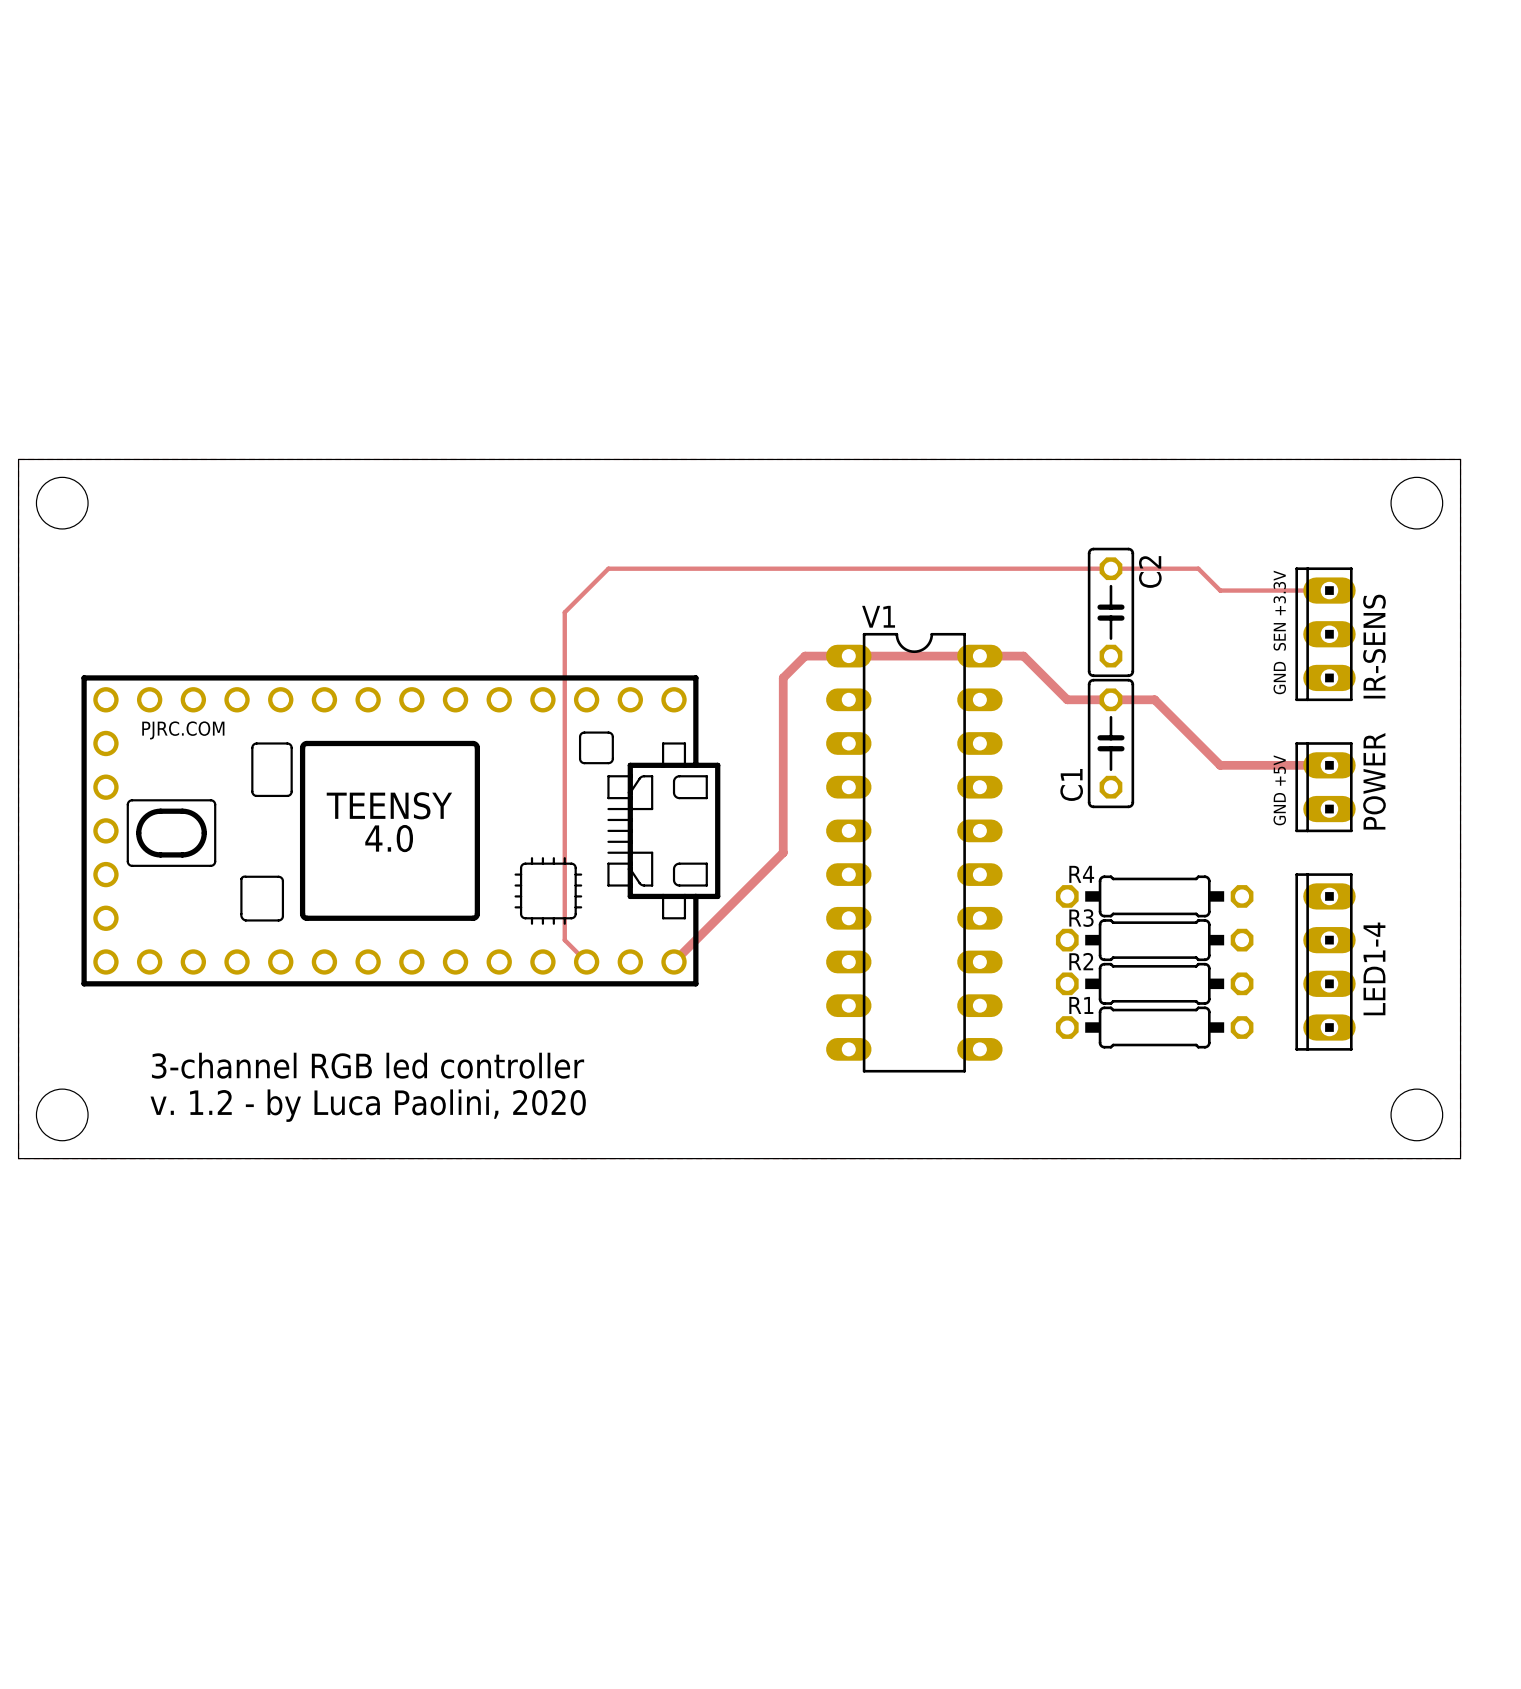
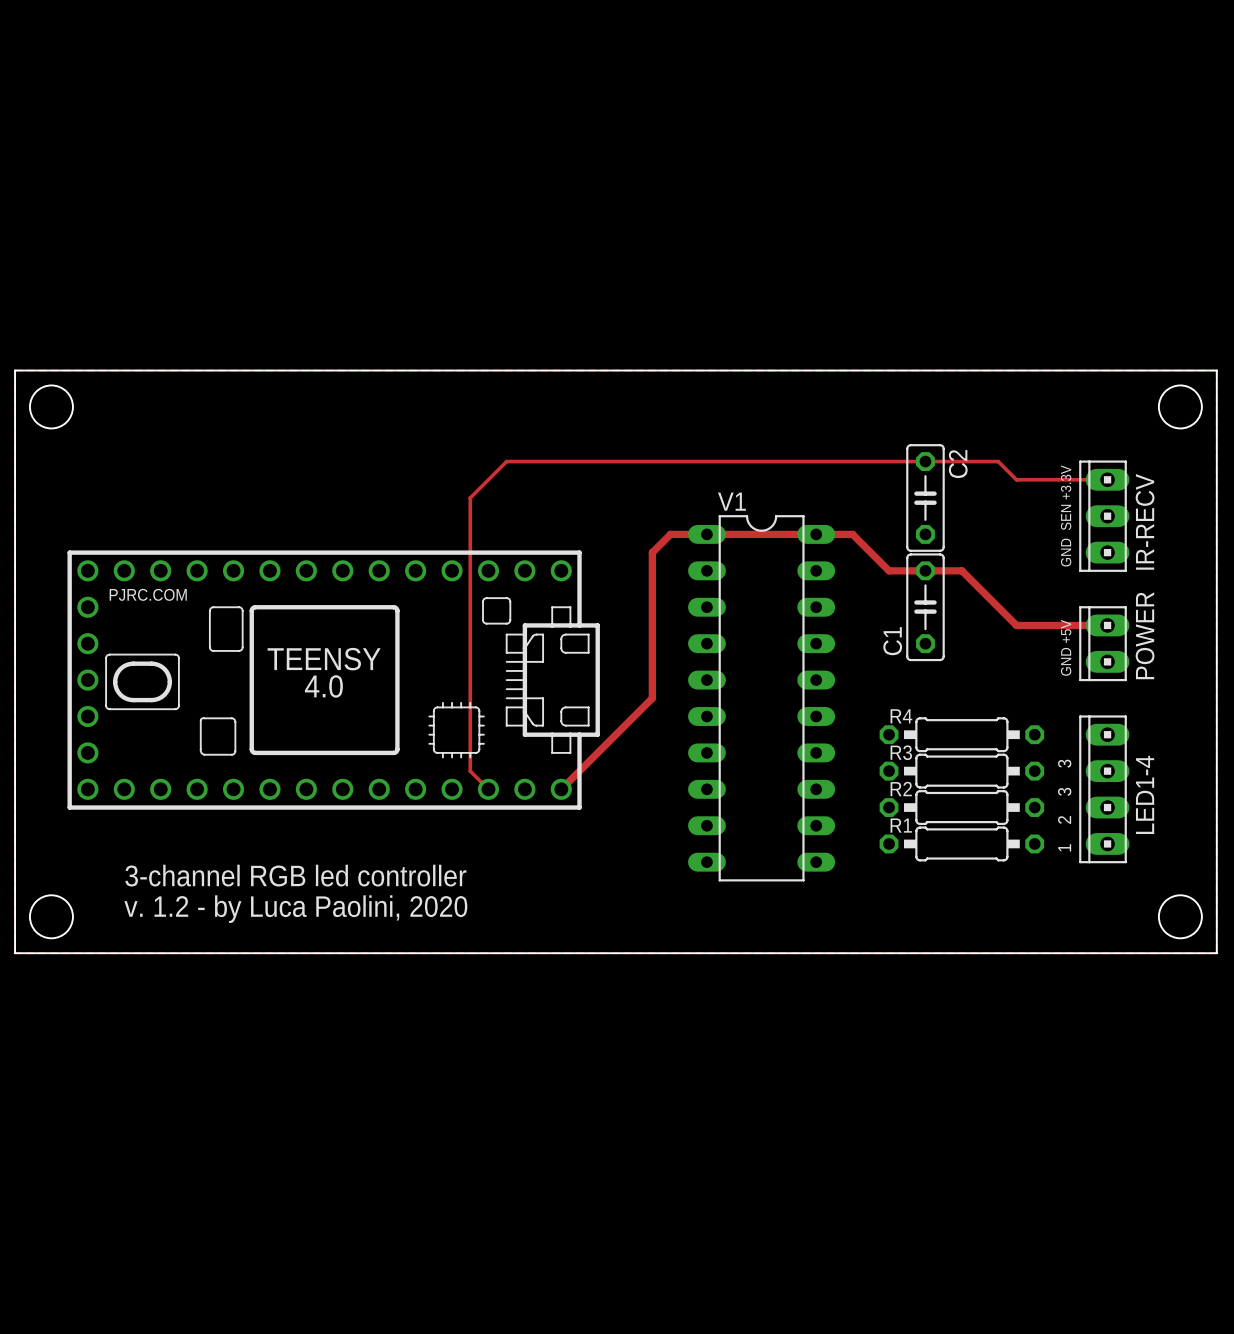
IR-SENS name: IR-SENS (1374, 646) -> IR-RECV (1145, 521)
text: none -> 1 2 3 3 (1064, 805)

